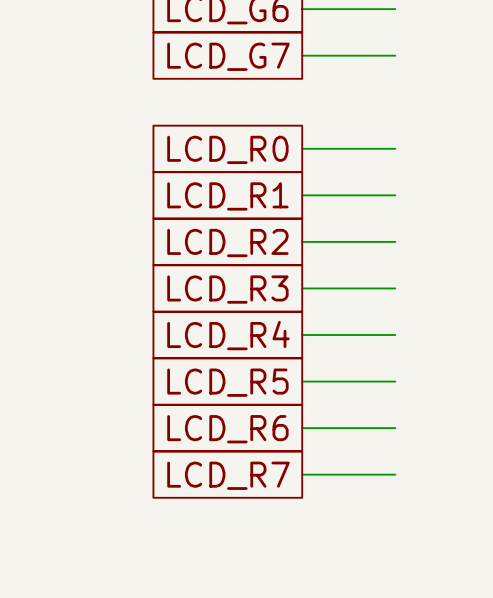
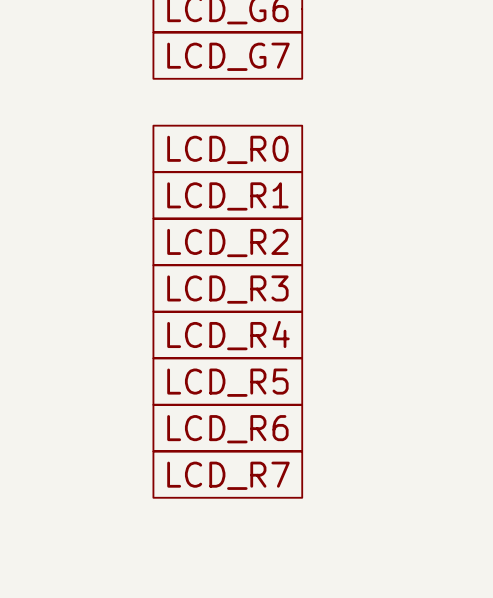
wire: (302, 9) (395, 9) -> none
wire: (302, 55) (395, 55) -> none
wire: (302, 148) (395, 148) -> none
wire: (302, 195) (395, 195) -> none
wire: (302, 241) (395, 241) -> none
wire: (302, 288) (395, 288) -> none
wire: (302, 335) (395, 335) -> none
wire: (302, 381) (395, 381) -> none
wire: (302, 428) (395, 428) -> none
wire: (302, 474) (395, 474) -> none

